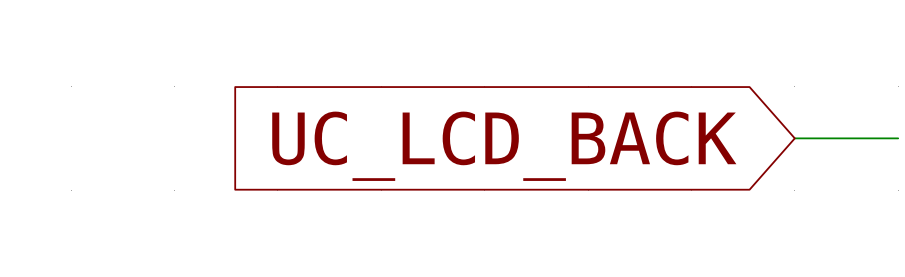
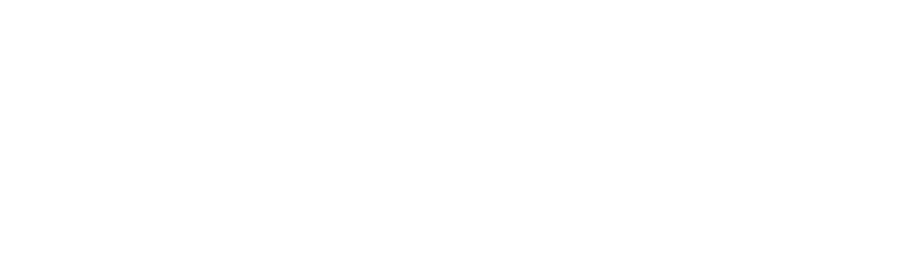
wire: (794, 138) (898, 138) -> none
global label: UC_LCD_BACK (504, 146) -> none

